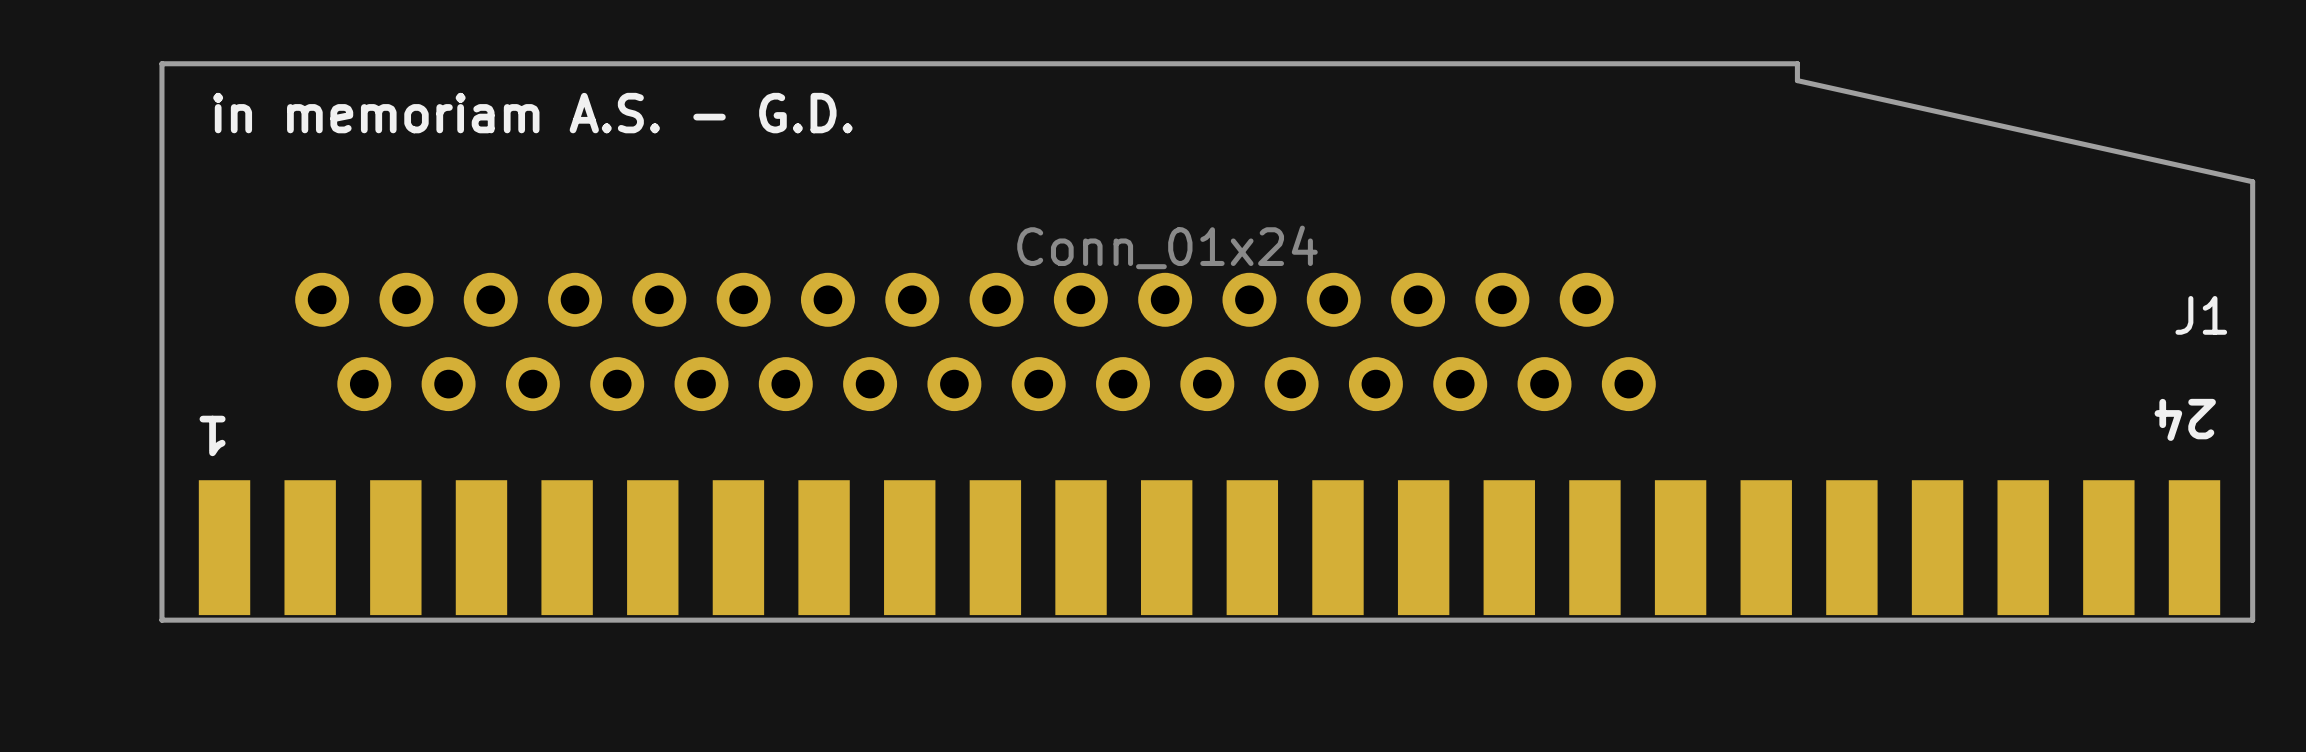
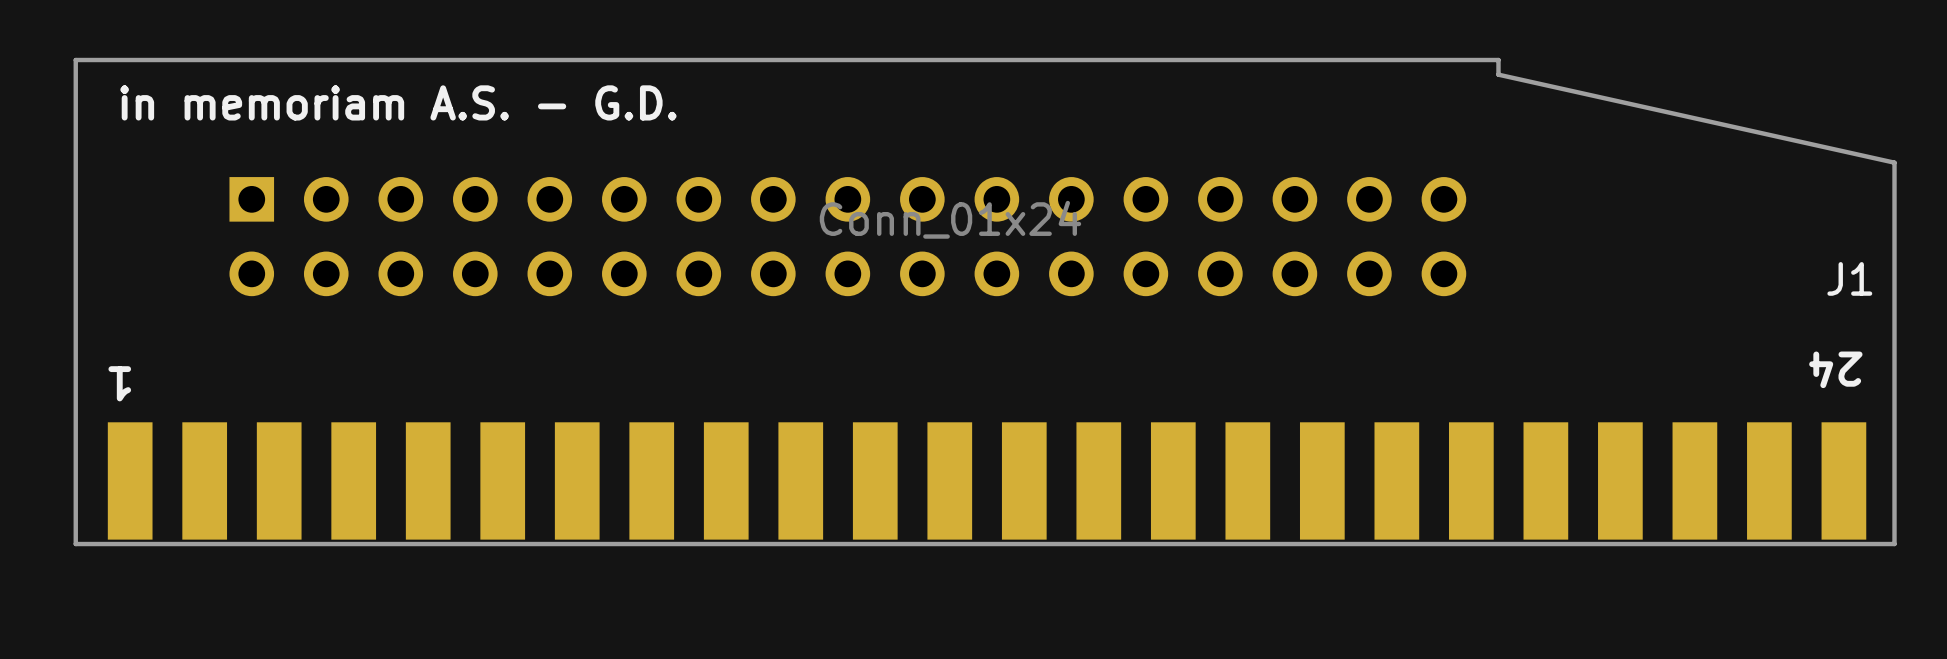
part: none -> (847, 236)
part: (975, 341) -> none

